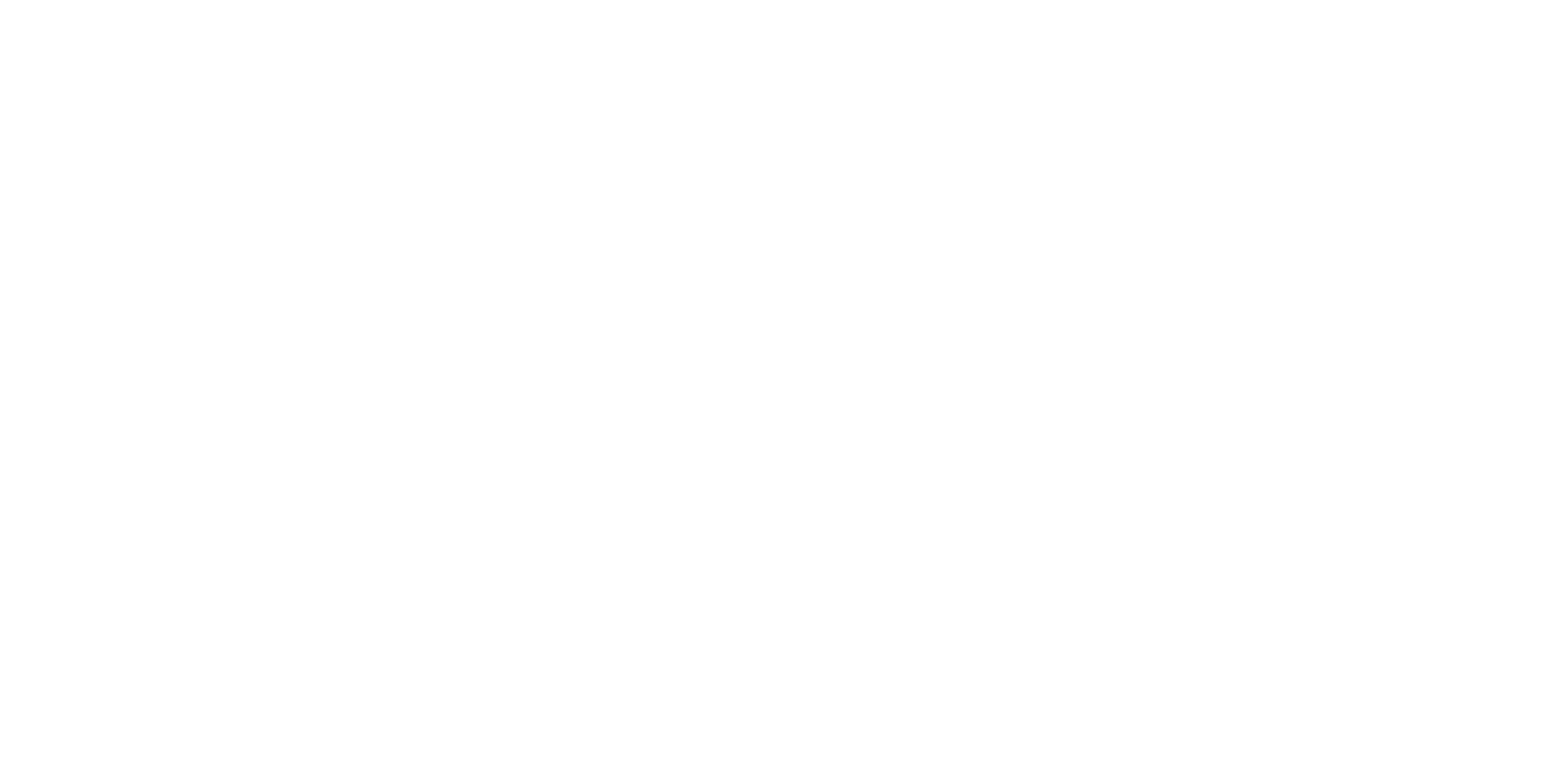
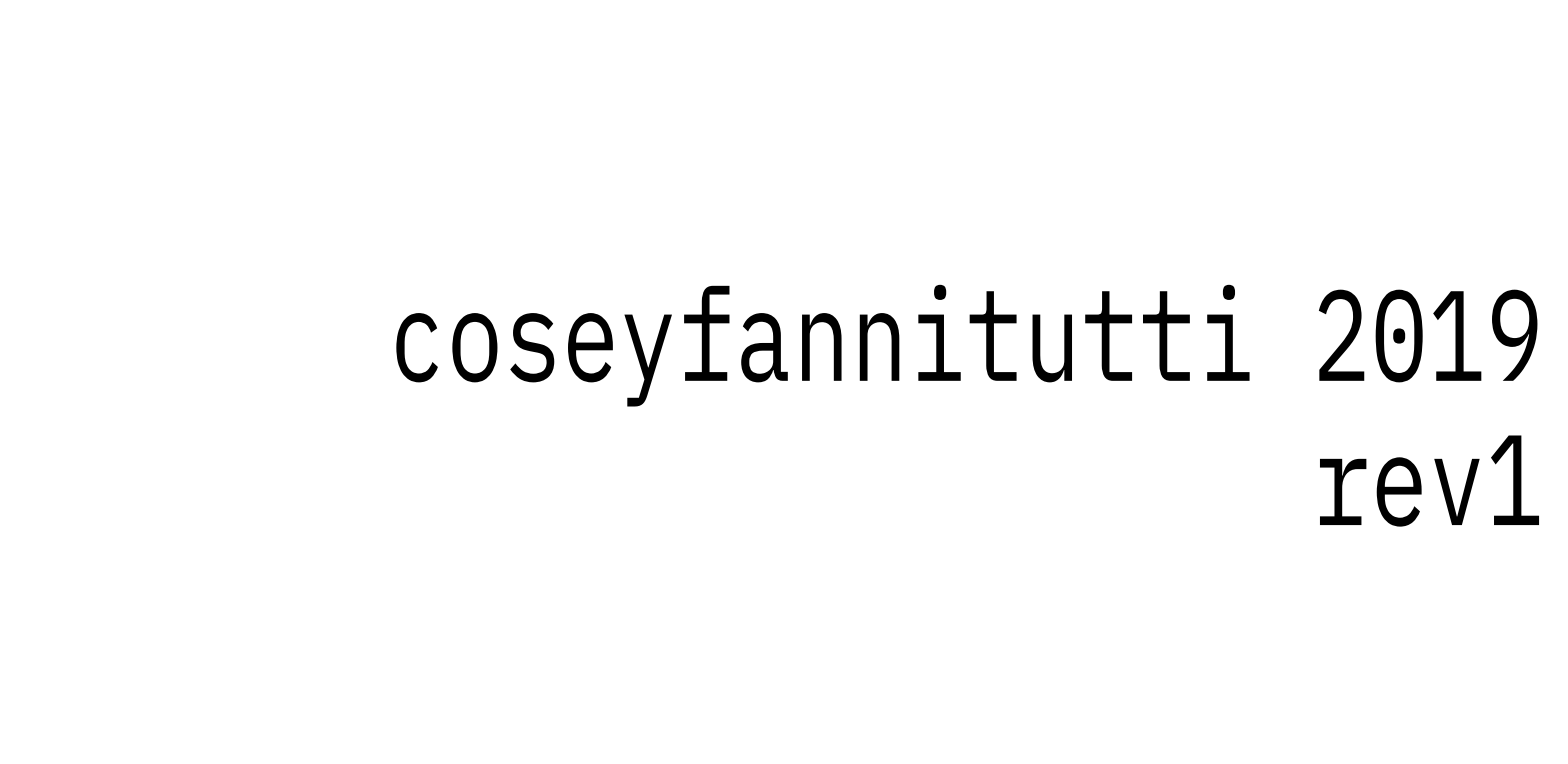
text: none -> coseyfannitutti 2019 (966, 345)
text: none -> rev1 (1429, 481)

